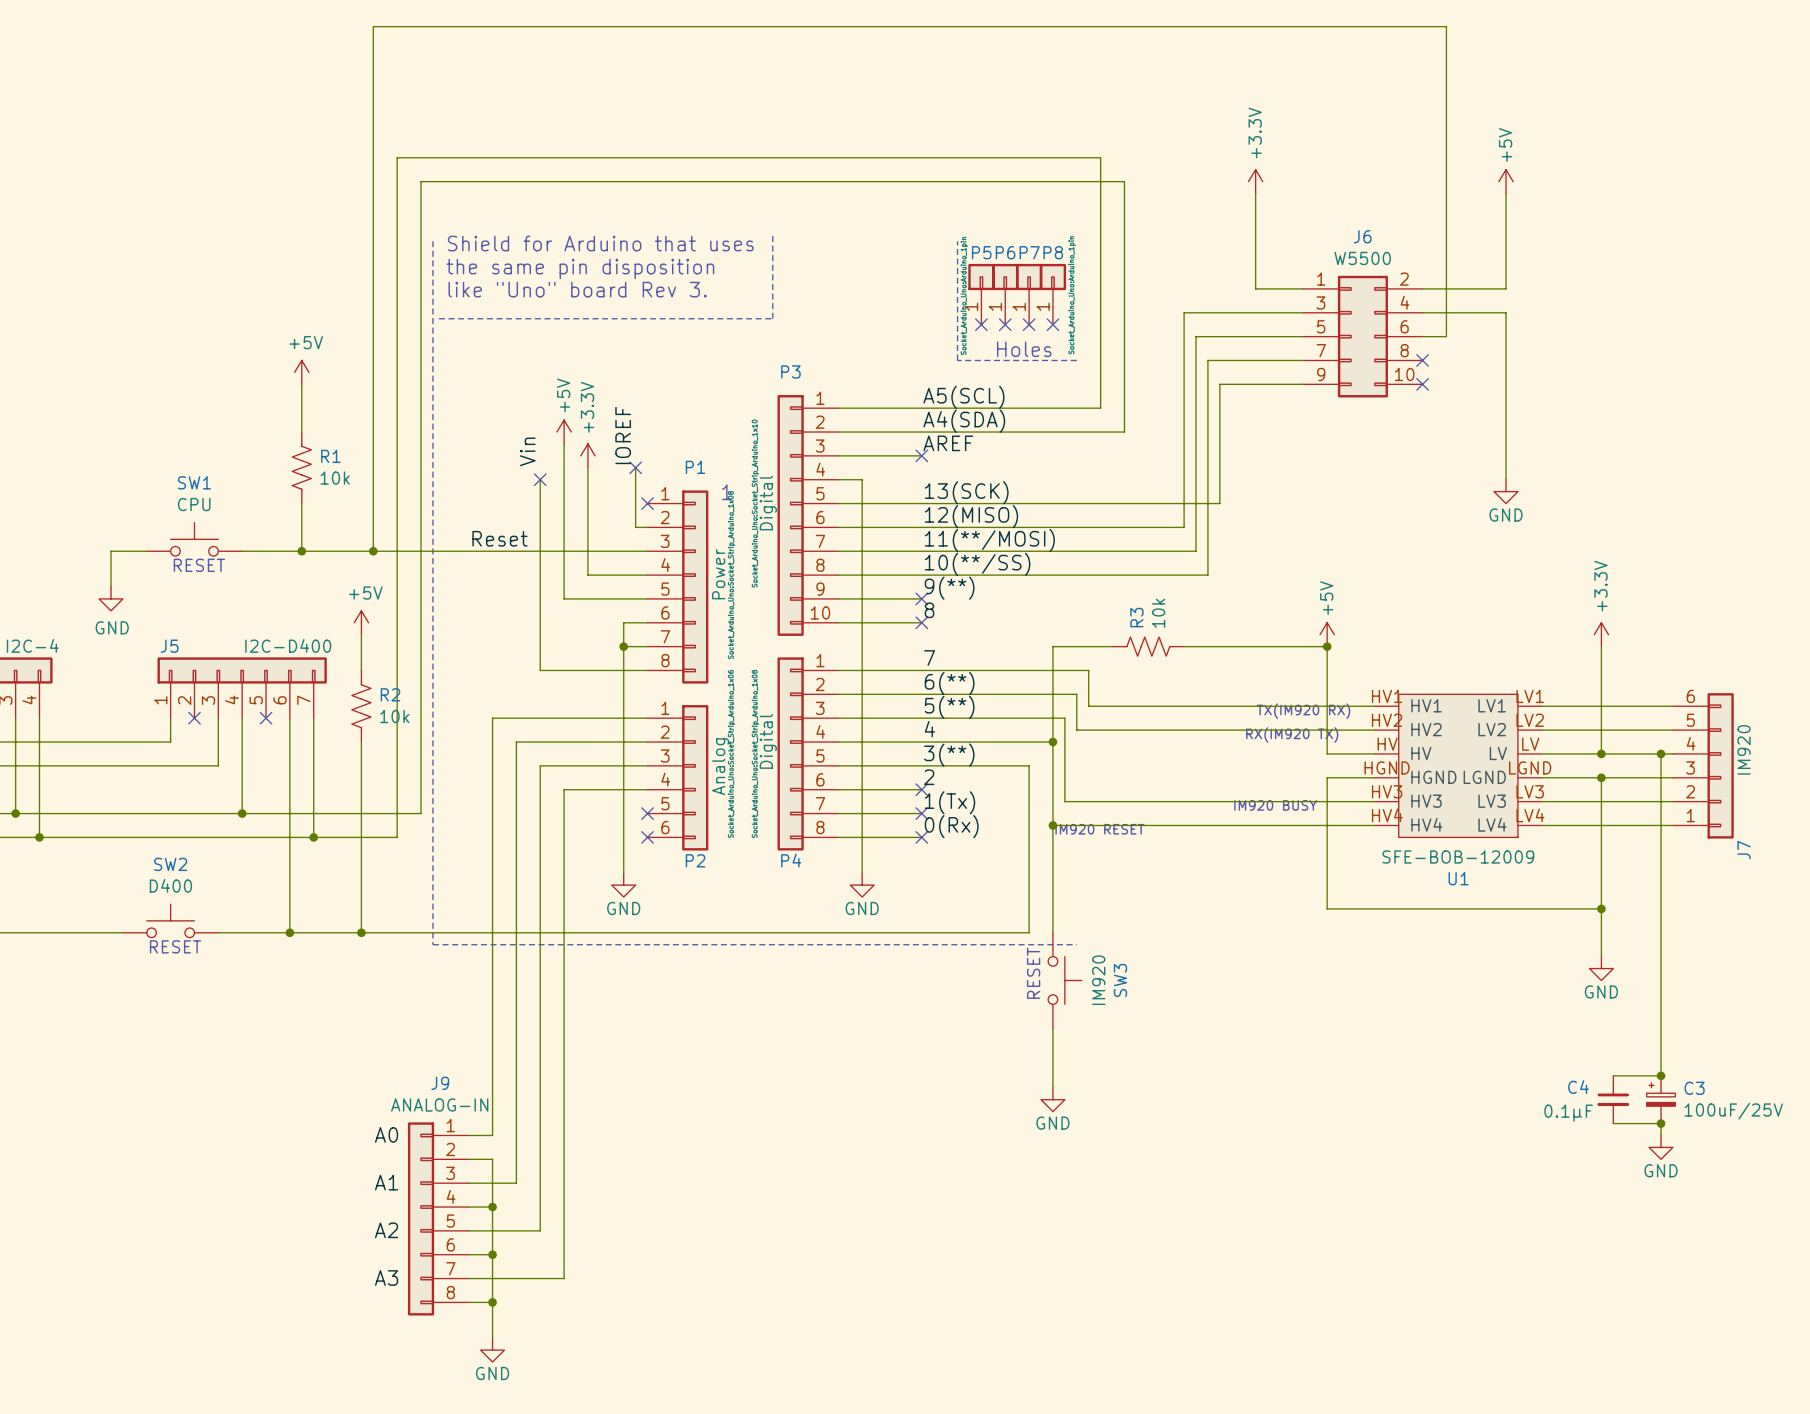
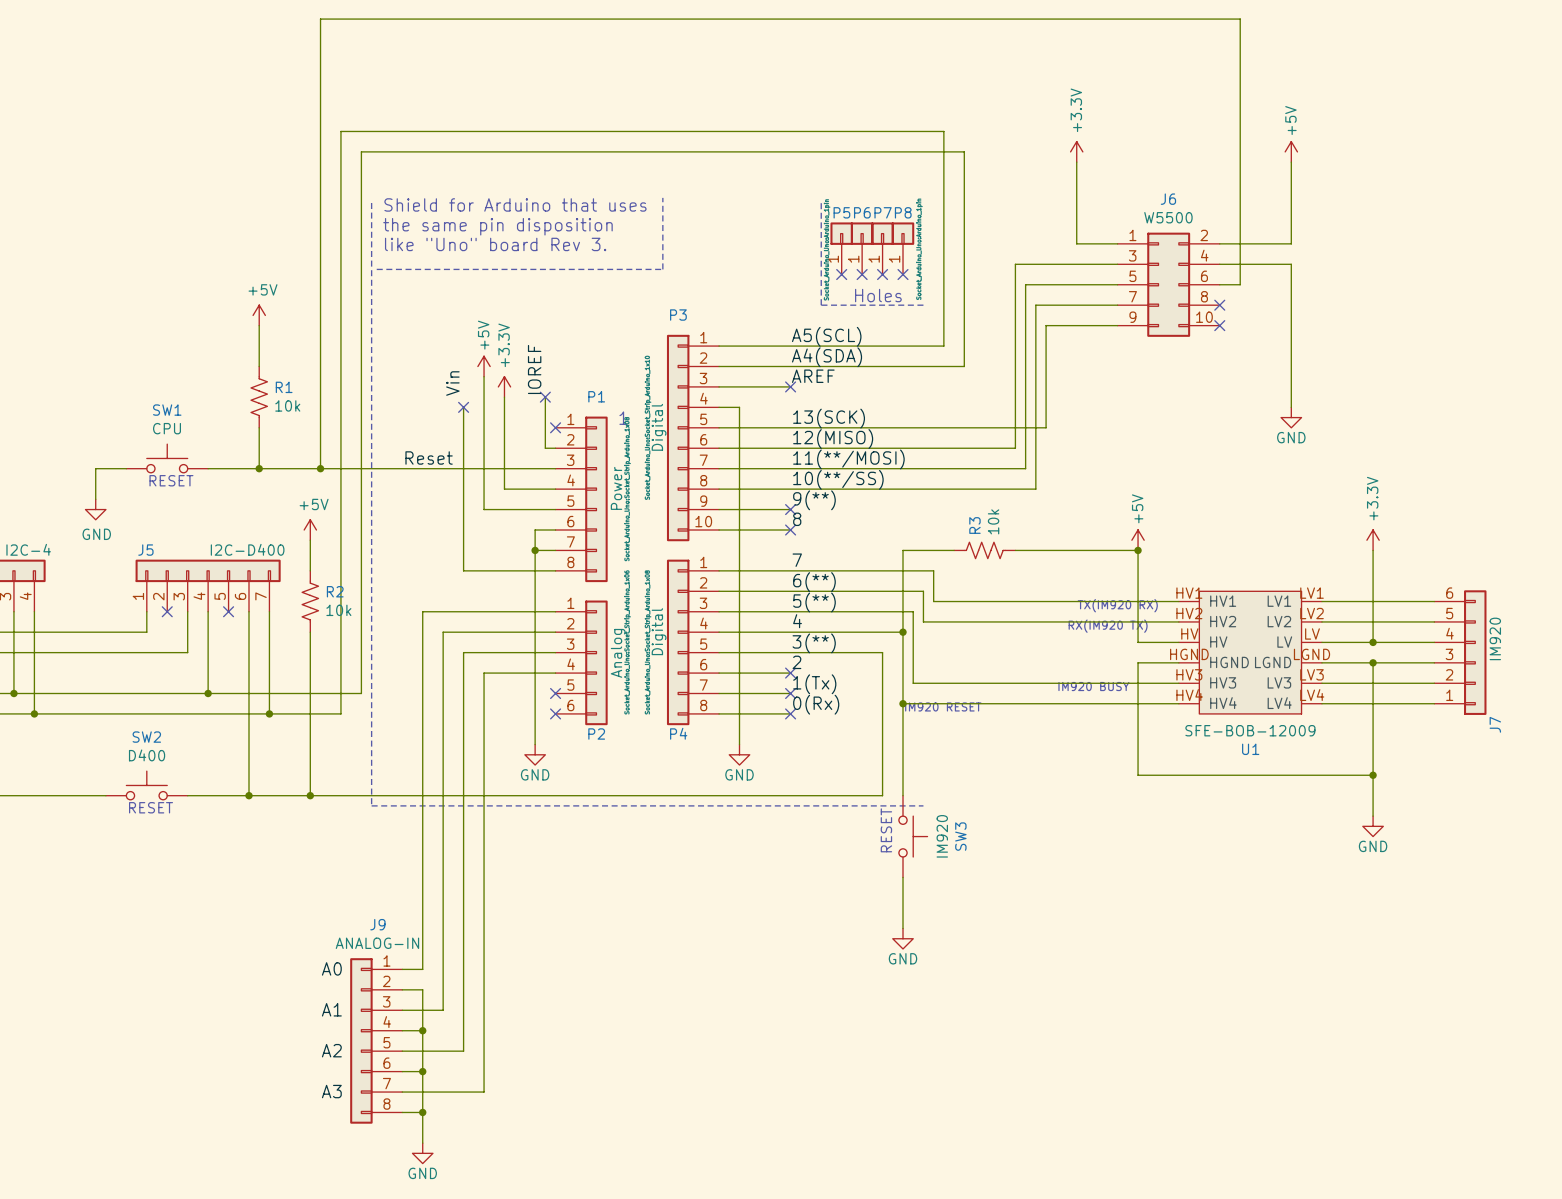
wire: (1661, 753) (1661, 1075) (1613, 1075) -> none
junction: (1661, 753) -> none
junction: (1661, 1075) -> none
C4: 0.1μF (1613, 1099) -> none
C3: 100uF/25V (1661, 1099) -> none
wire: (1613, 1123) (1661, 1123) (1661, 1135) -> none
junction: (1661, 1123) -> none
power symbol: GND (1661, 1147) -> none

